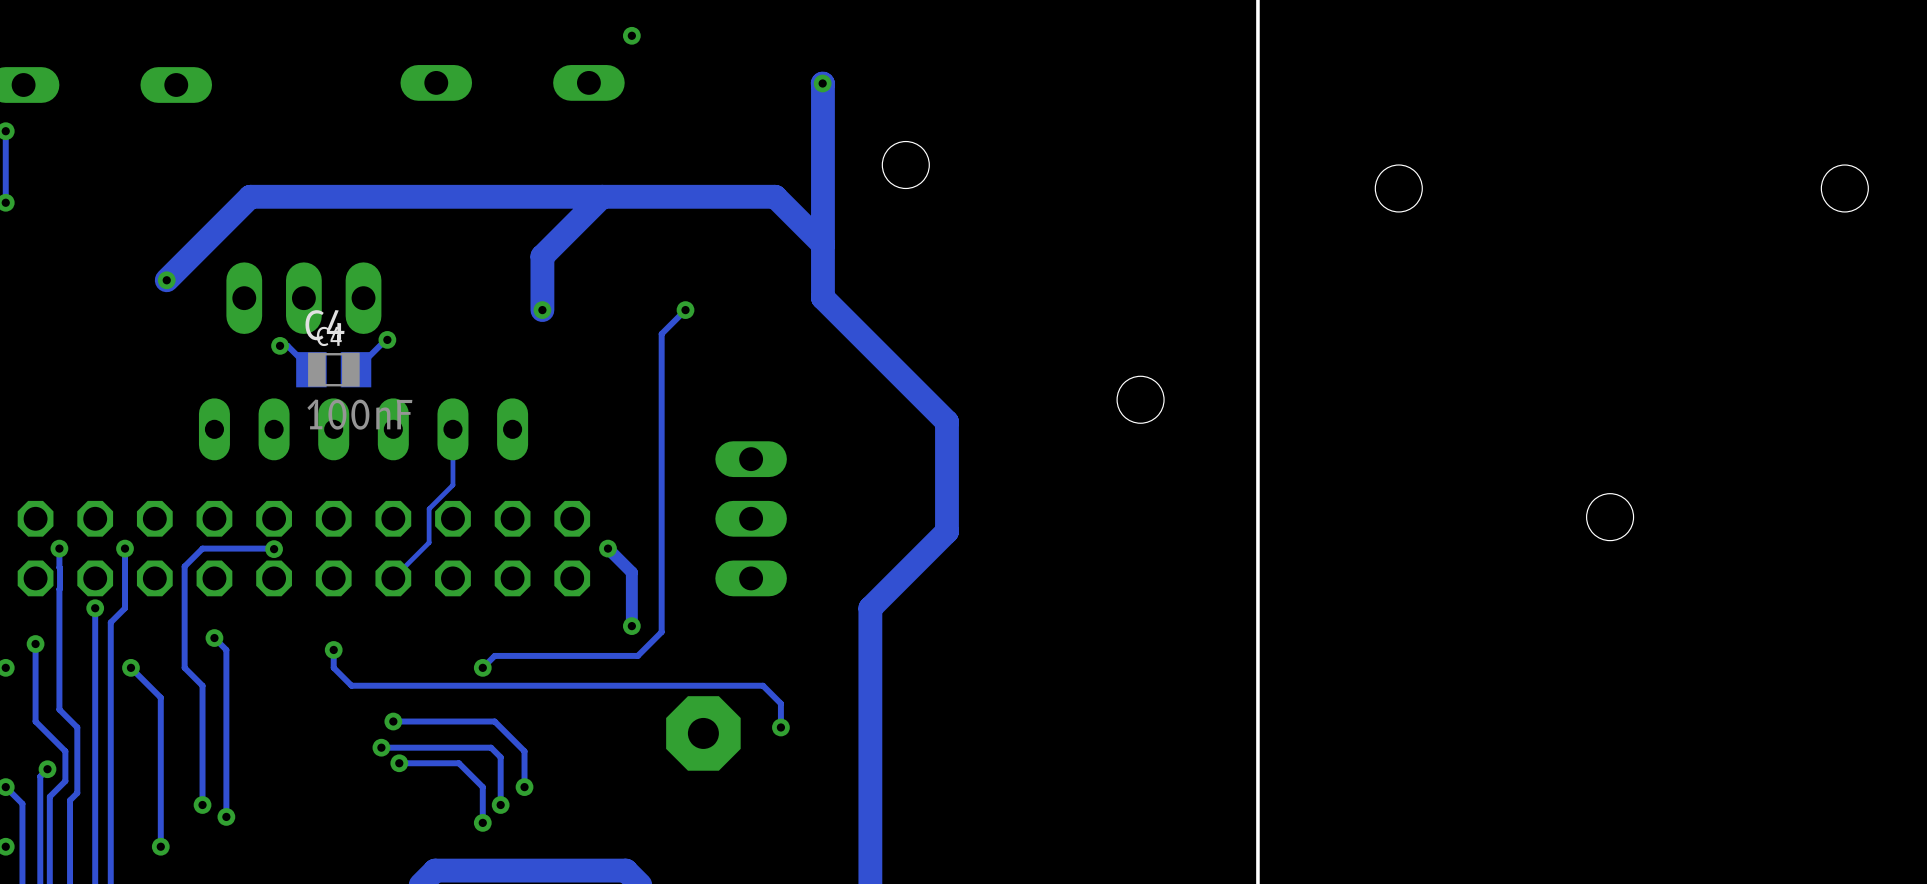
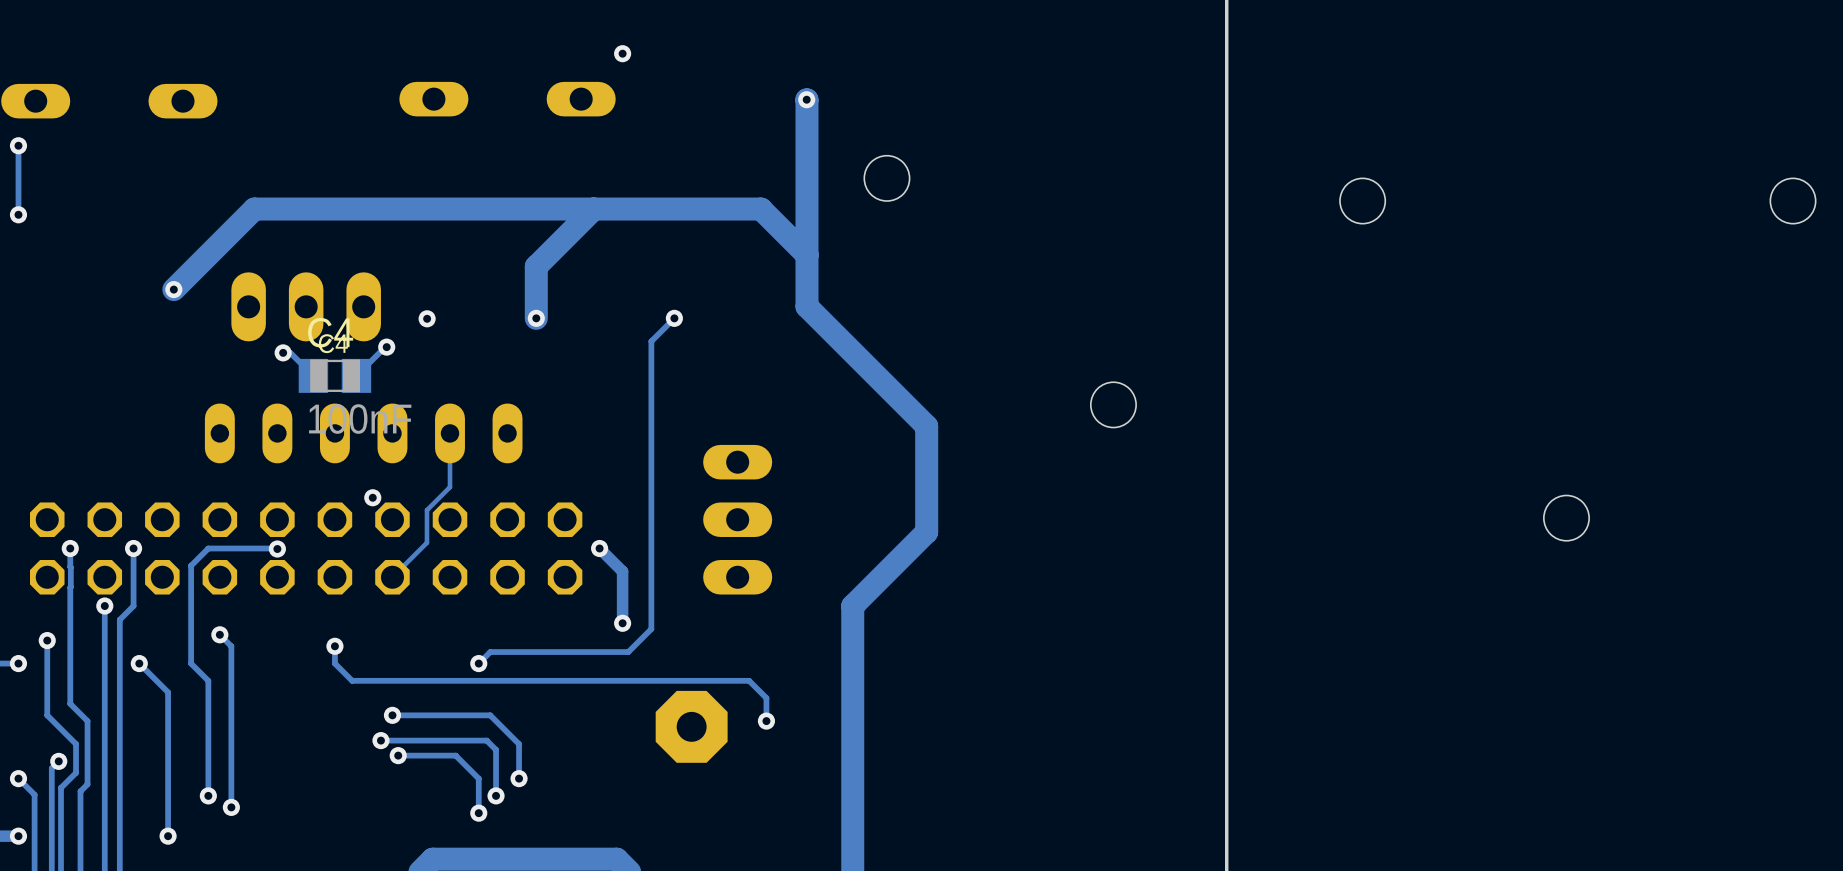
via: none -> (427, 318)
via: none -> (372, 497)

